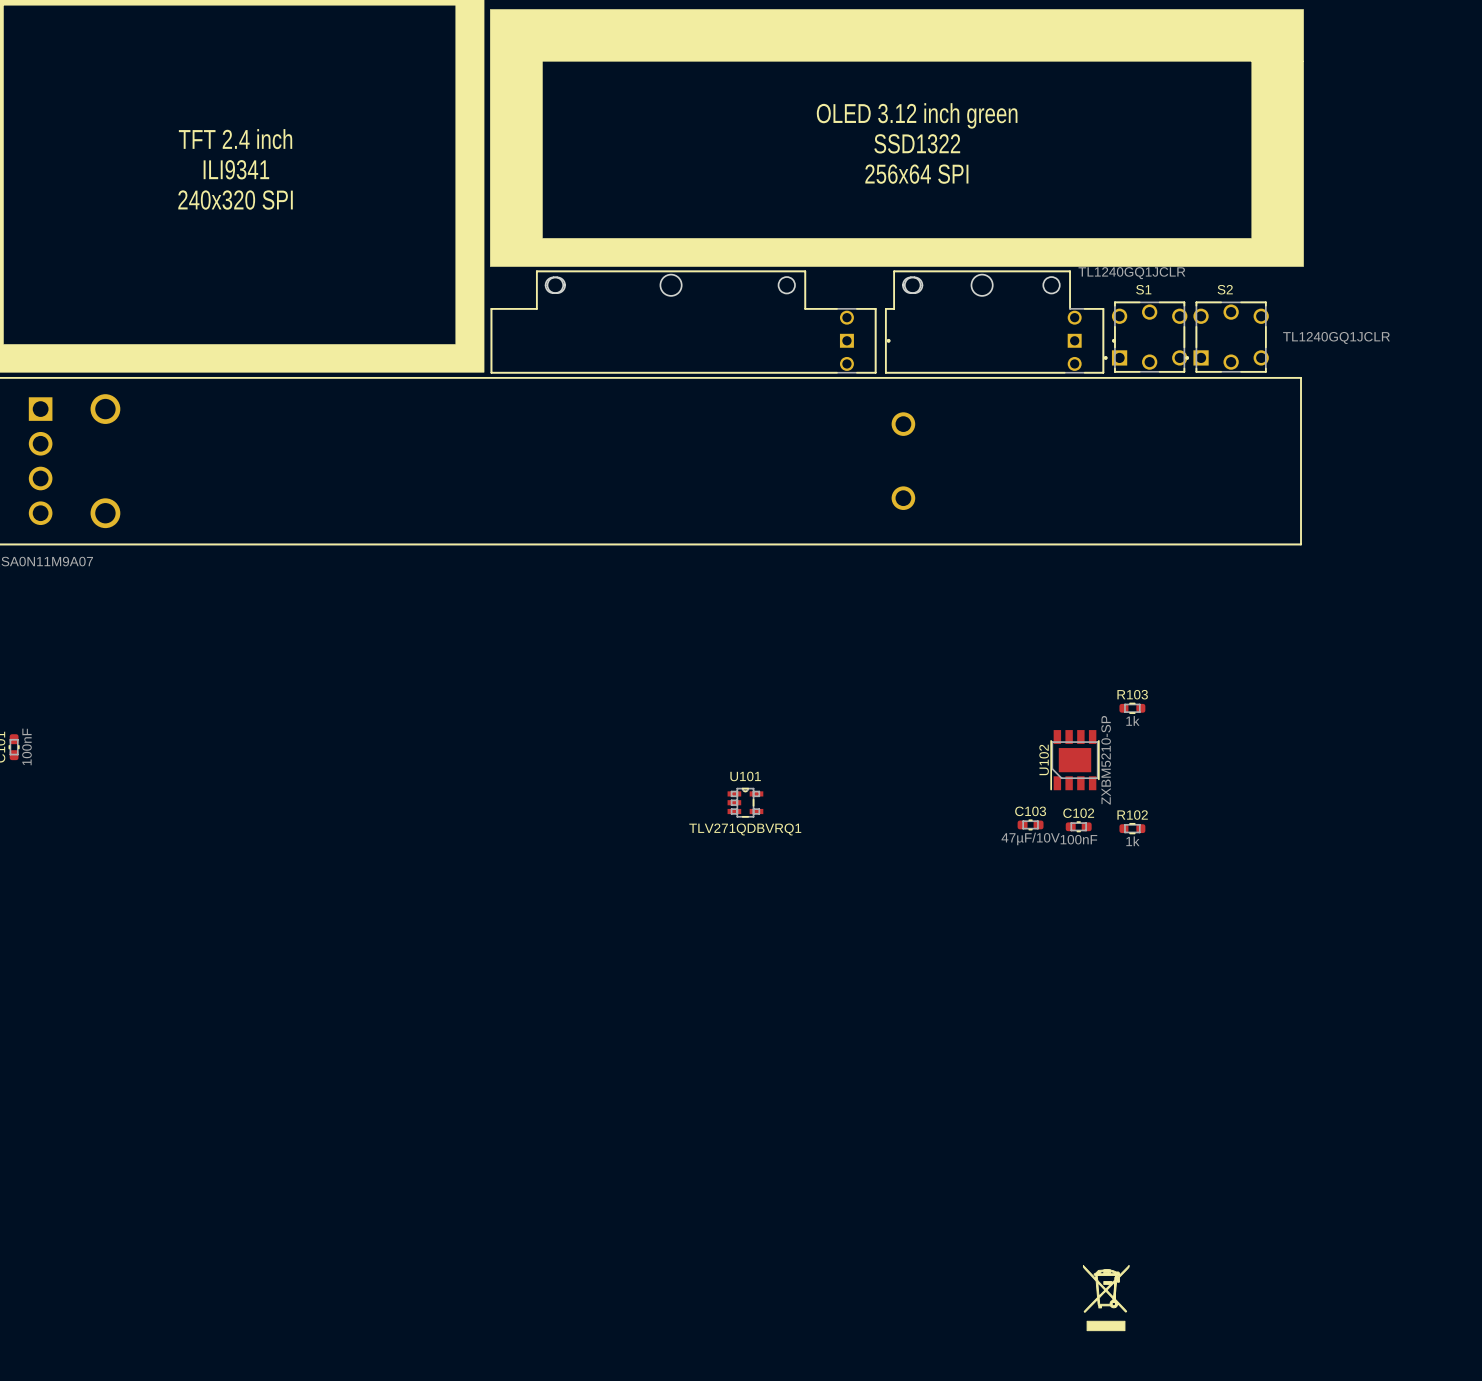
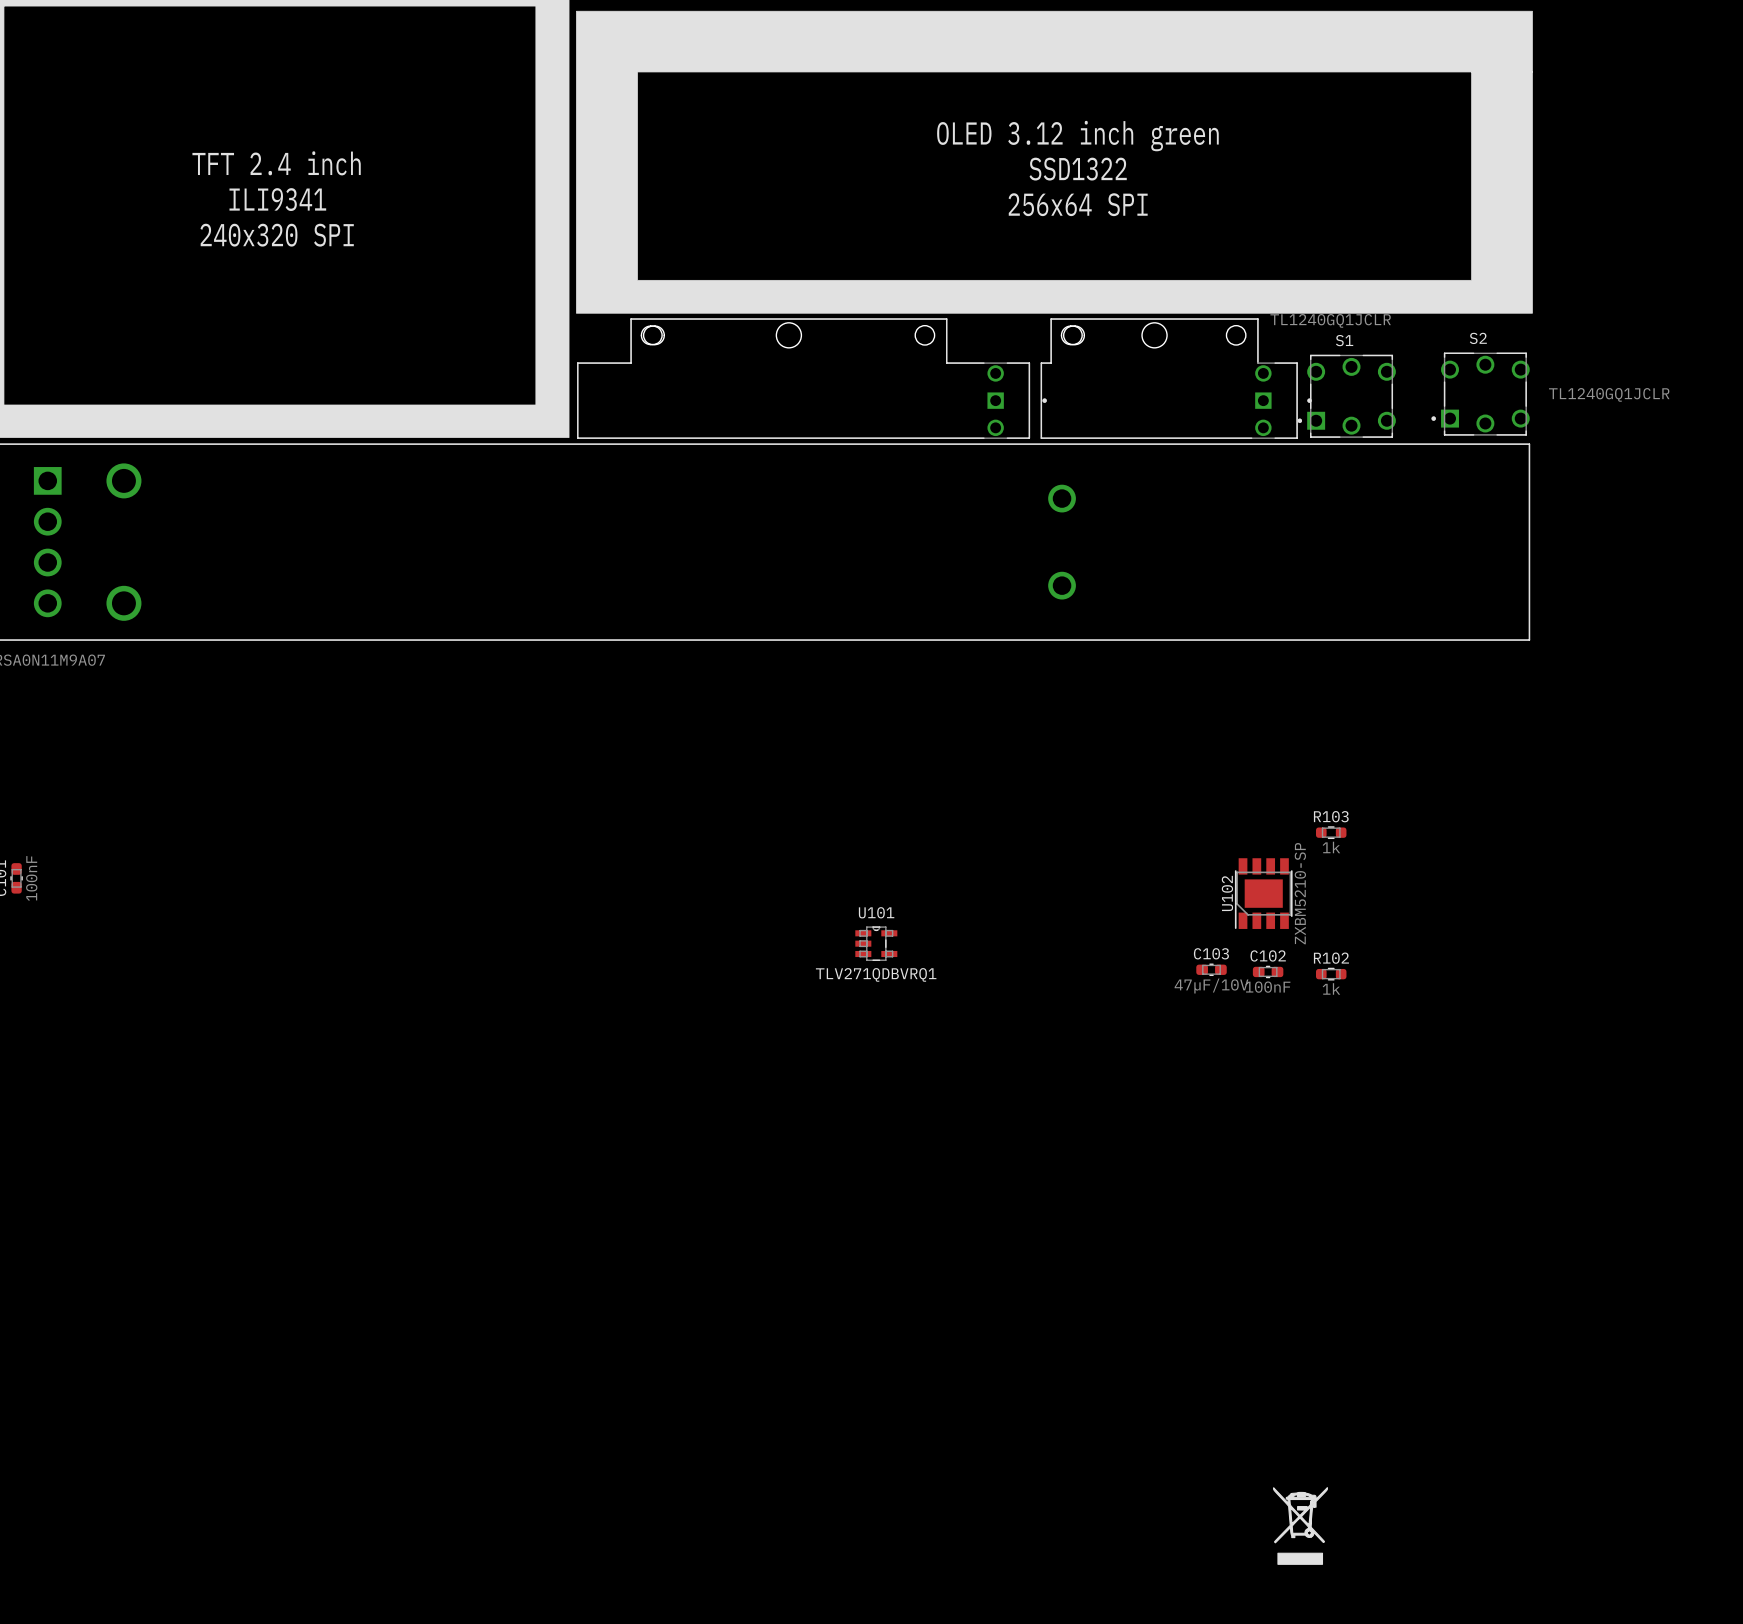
S2 position: (1227, 337) -> (1480, 394)

